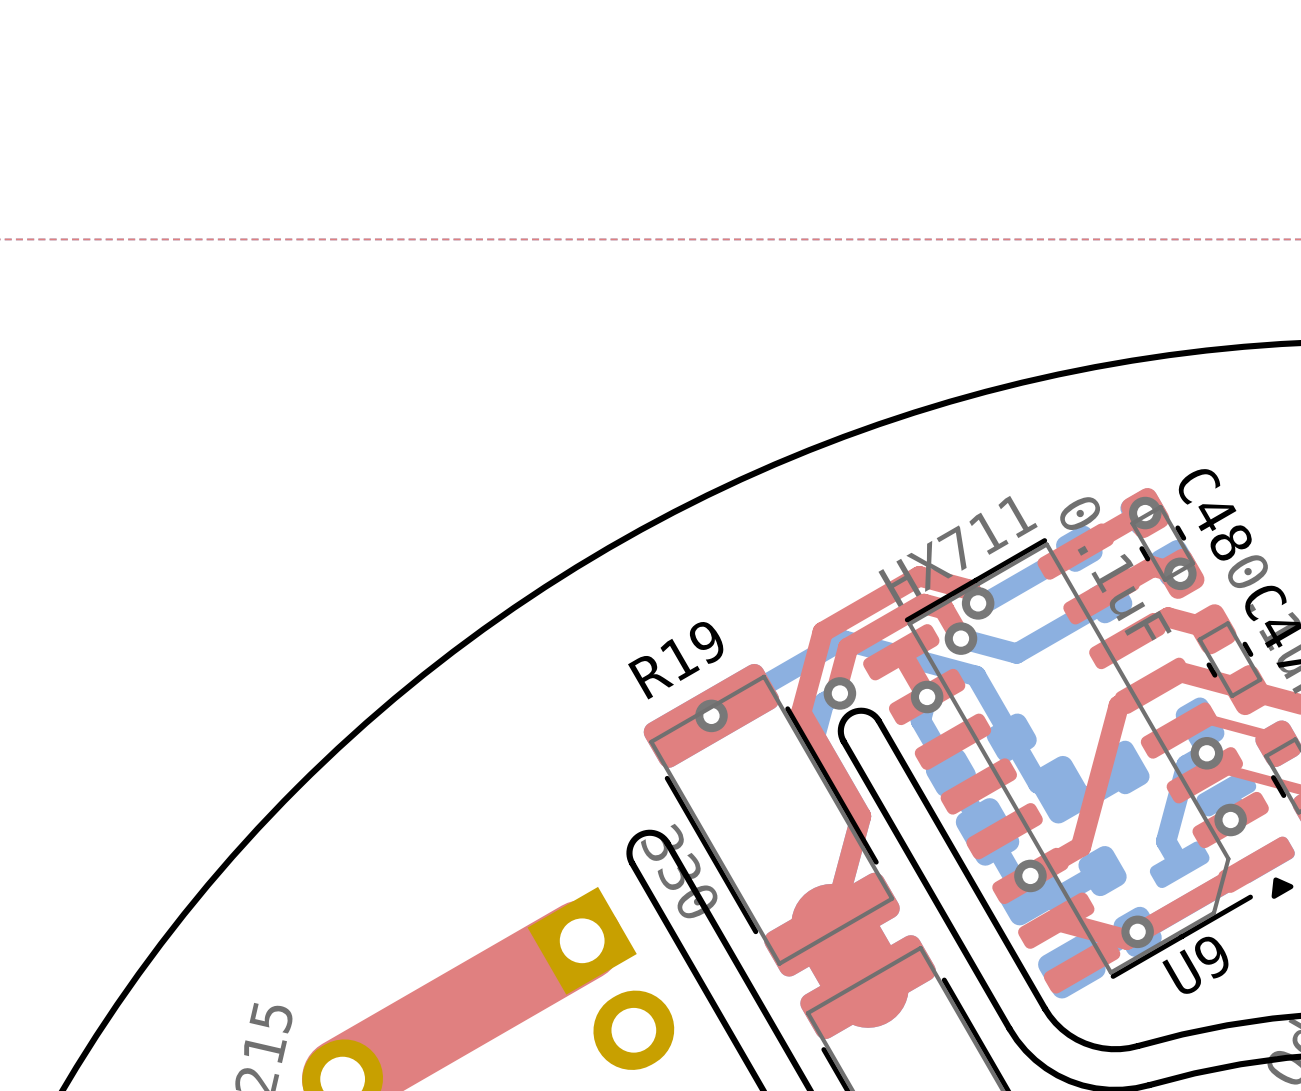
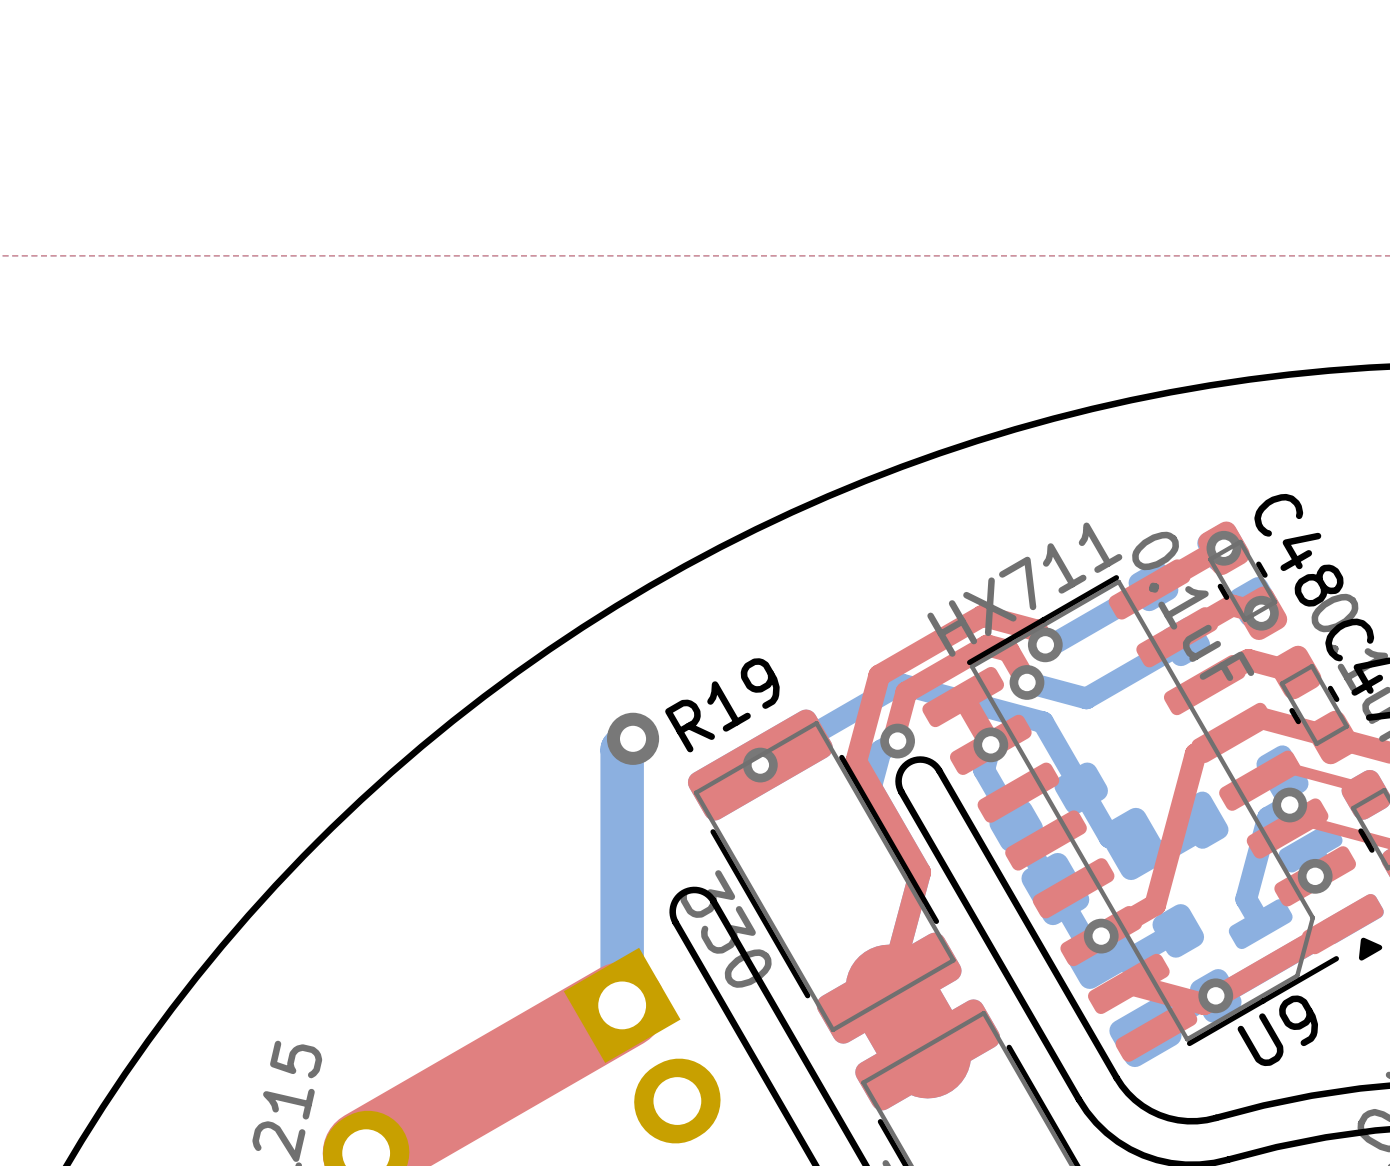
bottom track: none -> (633, 738) (622, 749) (622, 1005)
via: none -> (633, 738)

